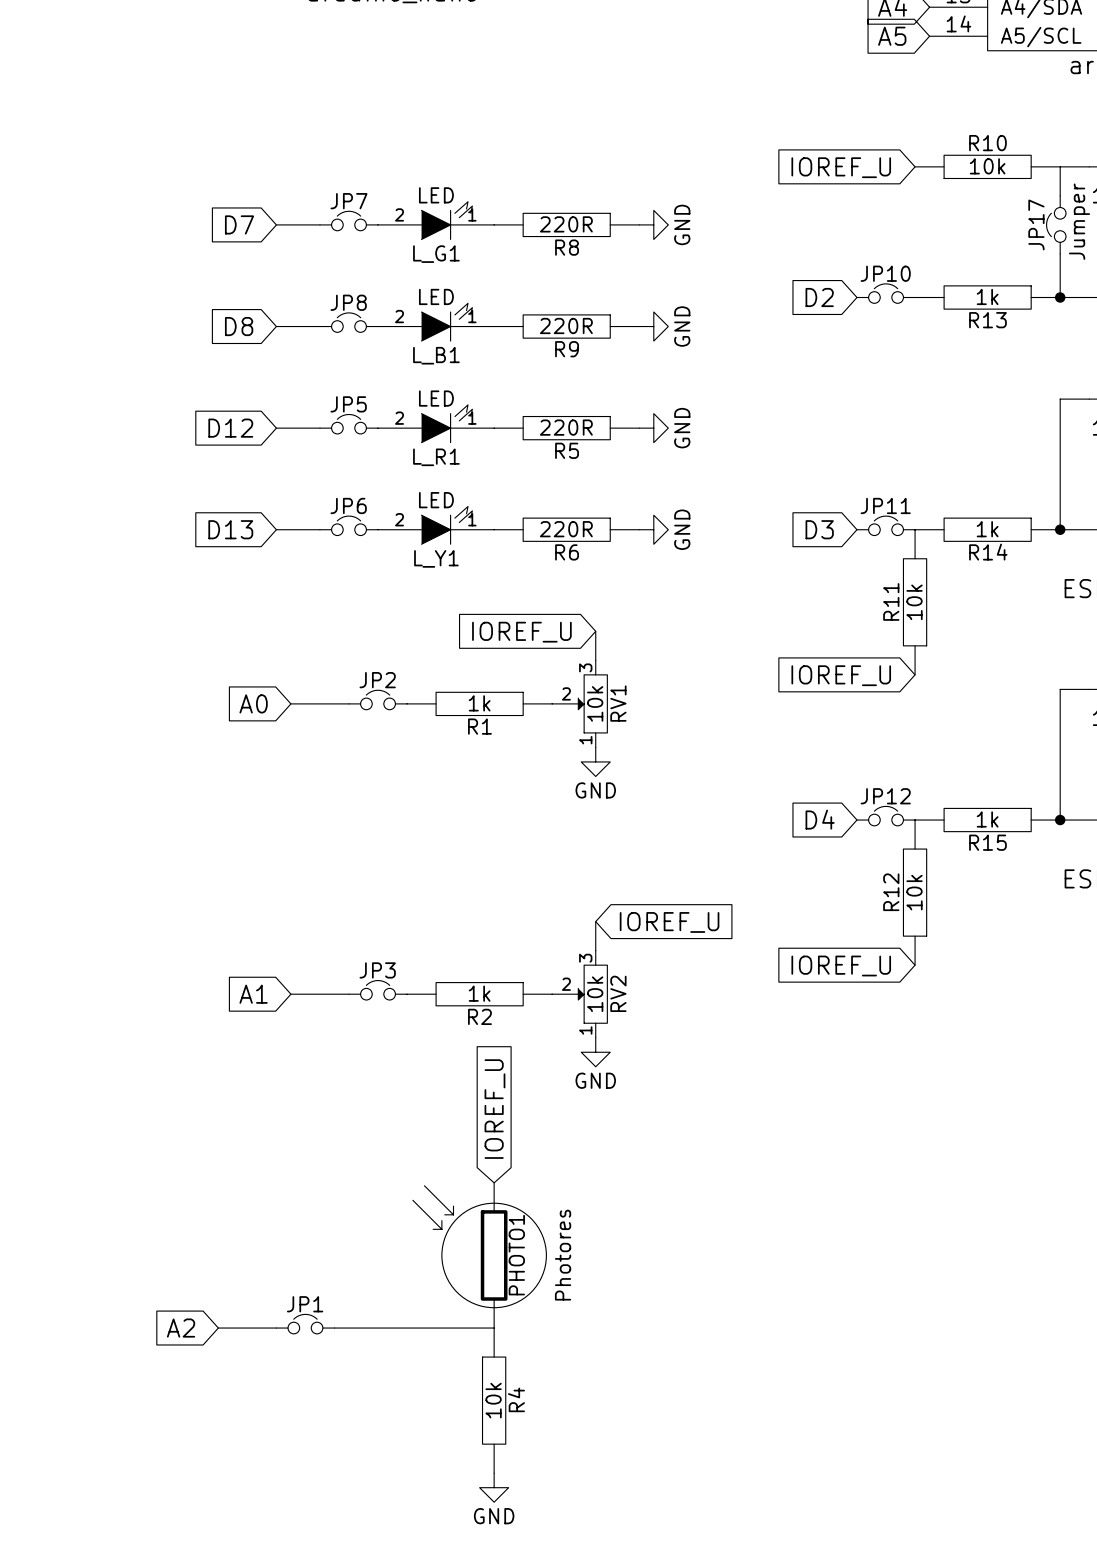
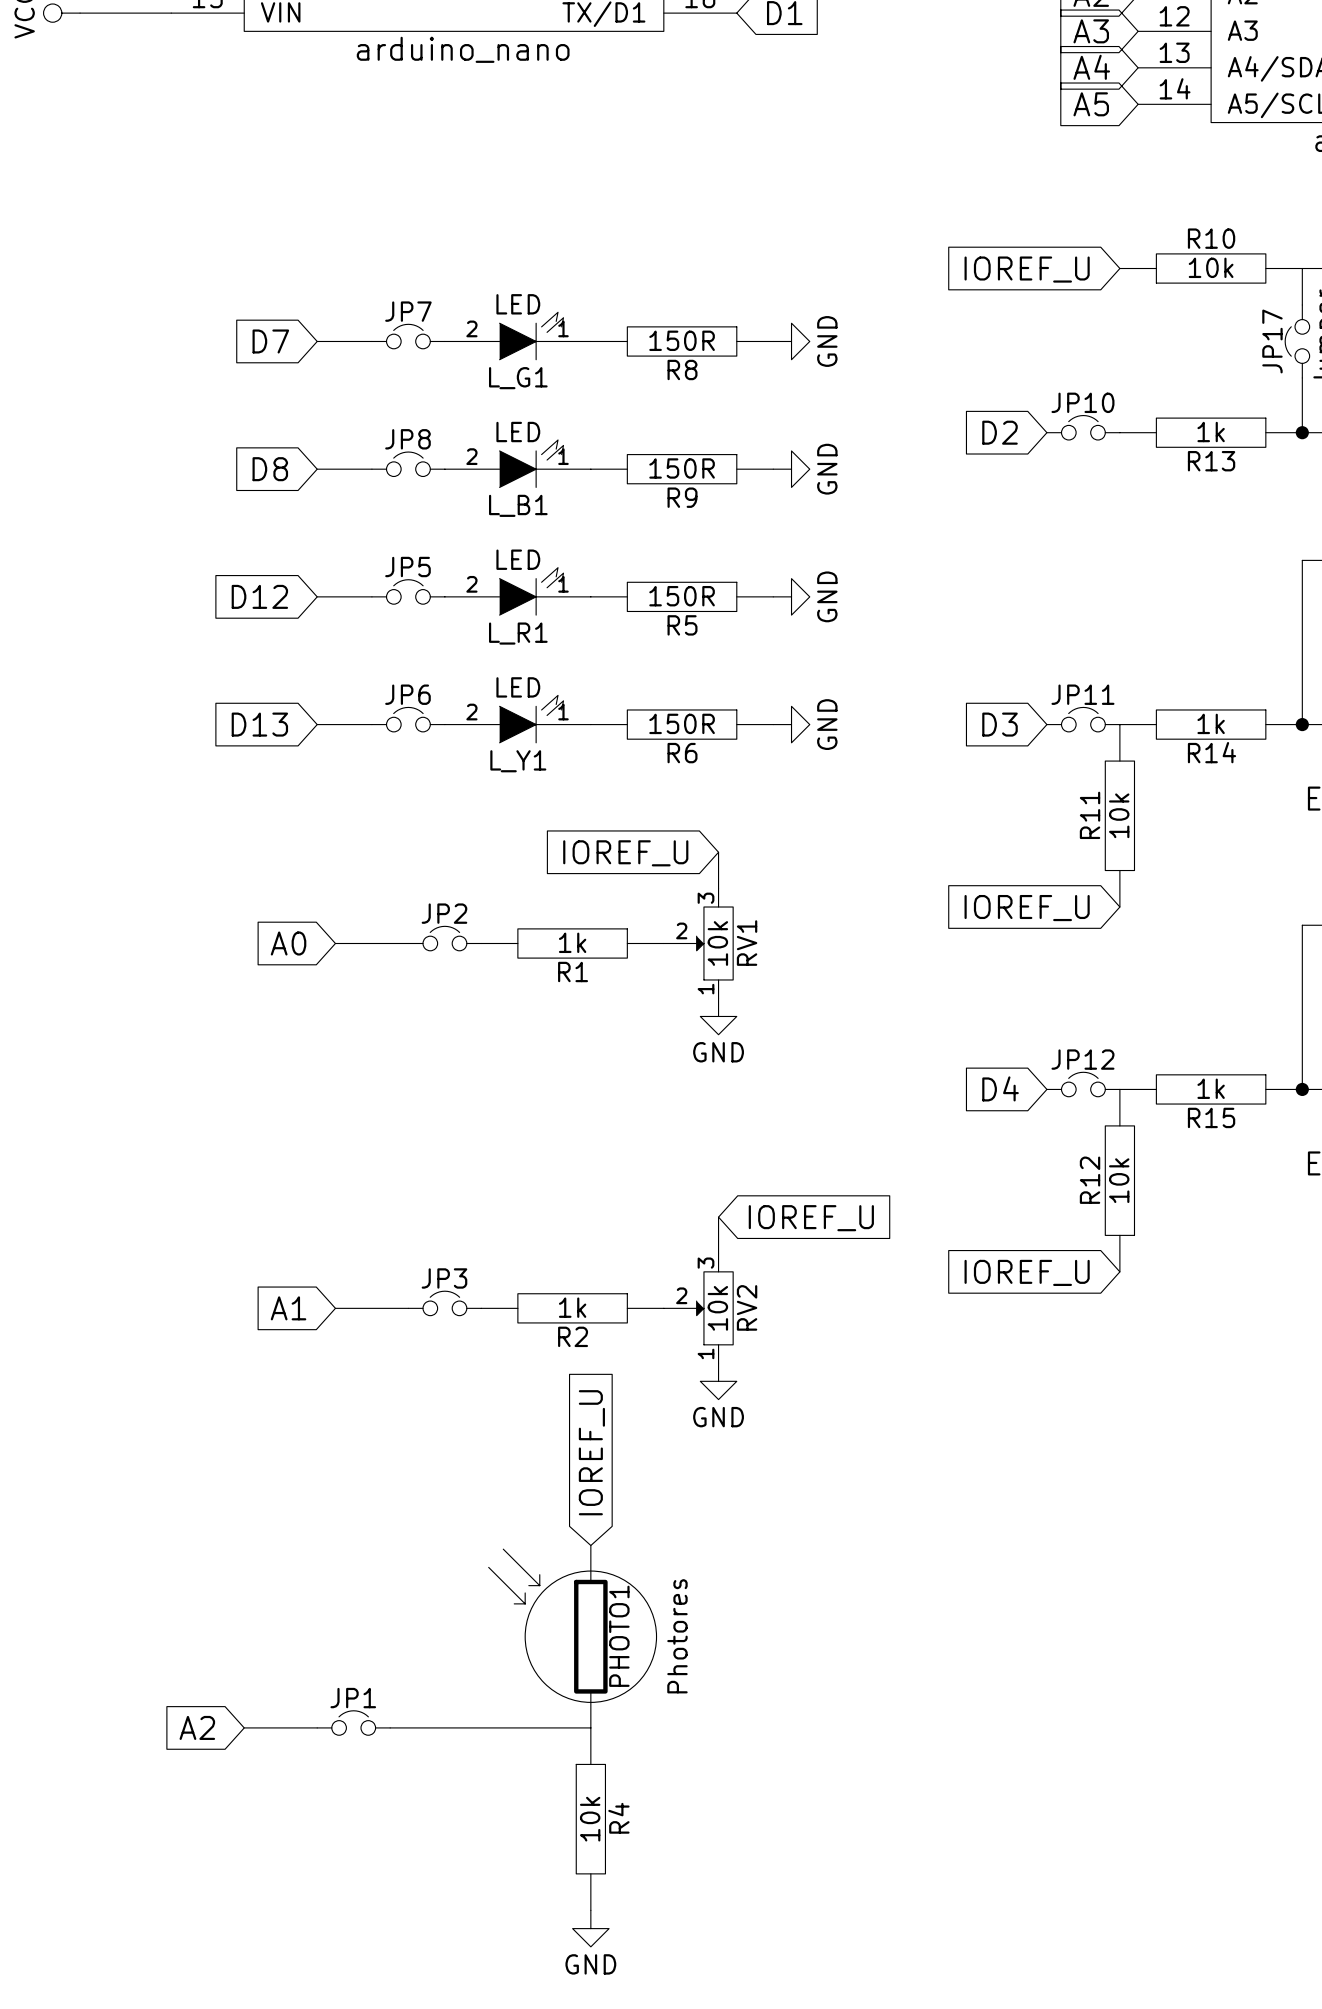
R8 value: 220R (566, 224) -> 150R (682, 340)
R9 value: 220R (566, 325) -> 150R (682, 468)
R5 value: 220R (566, 427) -> 150R (682, 596)
R6 value: 220R (566, 529) -> 150R (682, 723)

